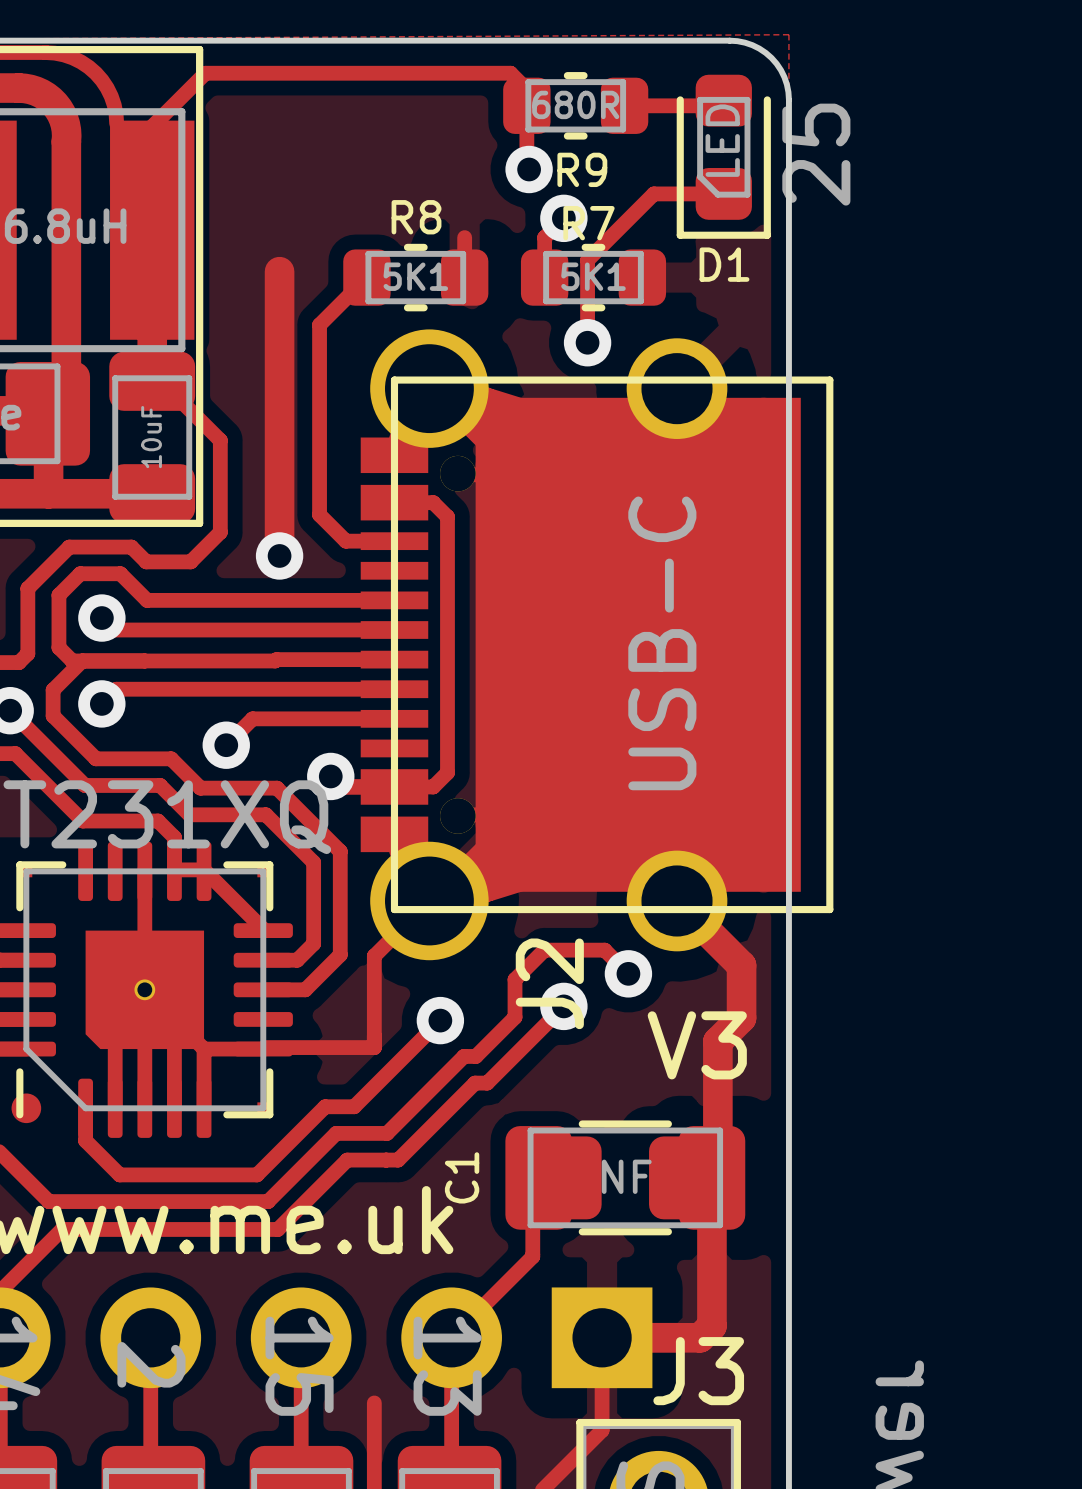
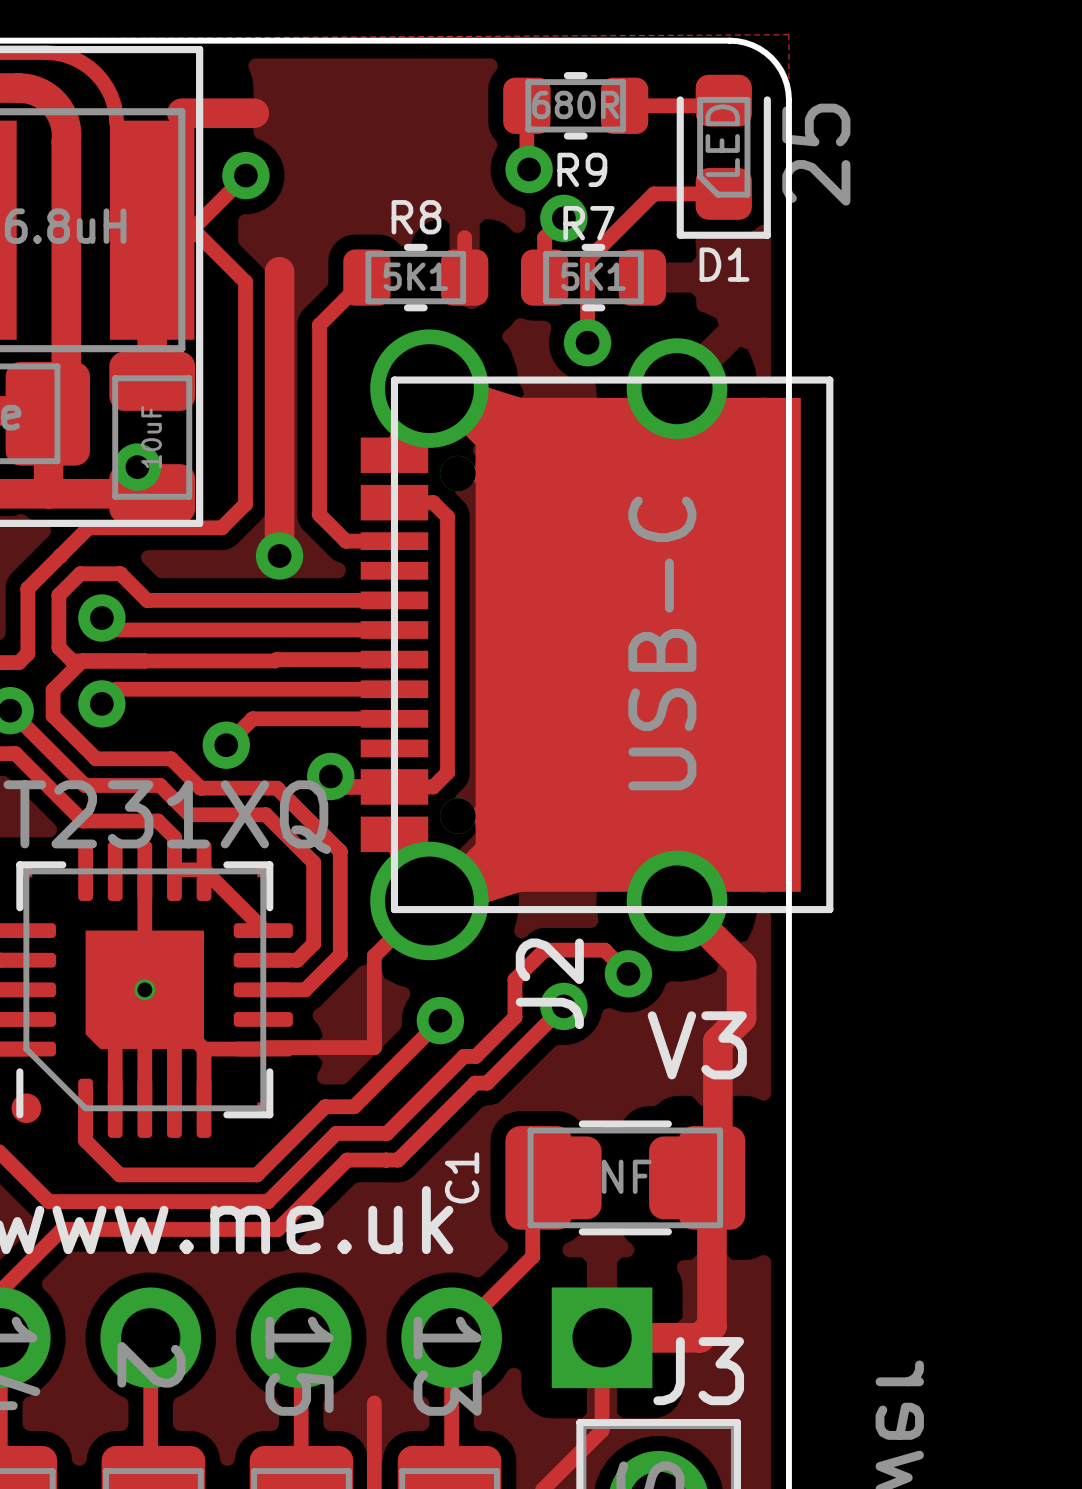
track: (526, 105) (526, 89) (510, 73) (205, 73) (152, 126) (152, 221) -> none
track: none -> (181, 113) (254, 113)
track: none -> (245, 175) (186, 234)
via: none -> (245, 175)
track: (152, 372) (220, 440) (220, 532) (190, 561) (146, 561) (131, 547) (69, 547) -> (181, 234) (198, 234) (245, 282) (245, 504) (221, 527) (88, 527) (69, 547)
via: none -> (137, 467)

